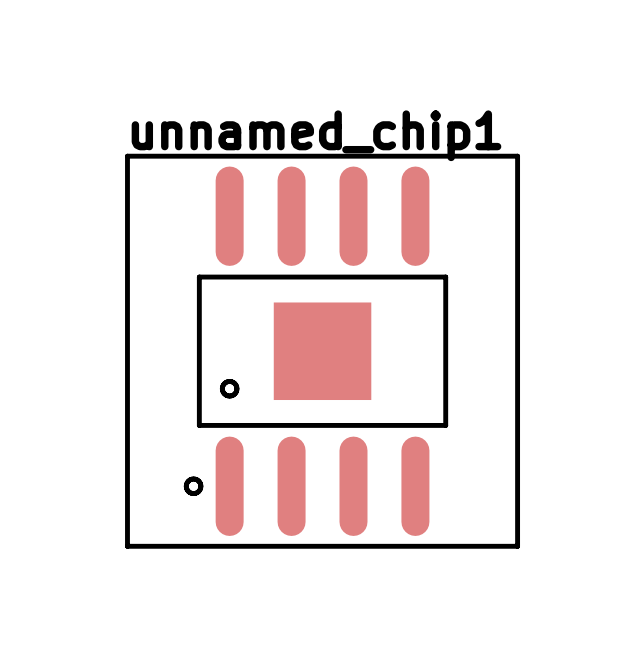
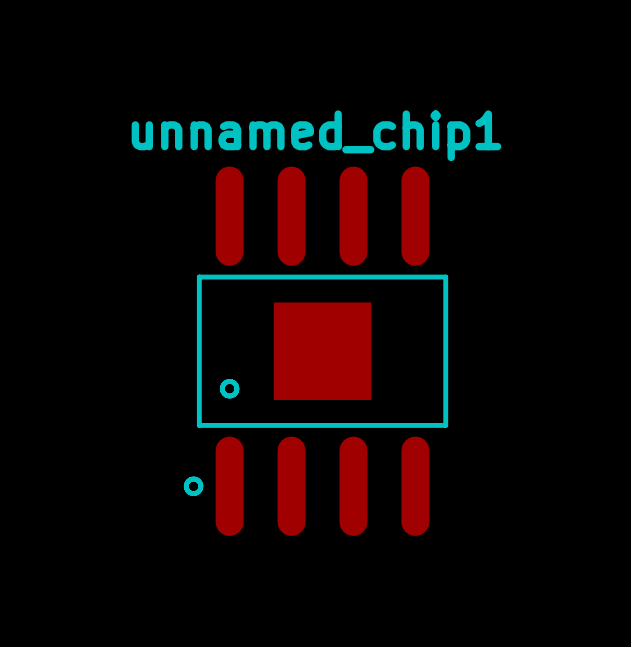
board edge: (127, 156) (517, 156) (517, 546) (127, 546) (127, 156) -> none

